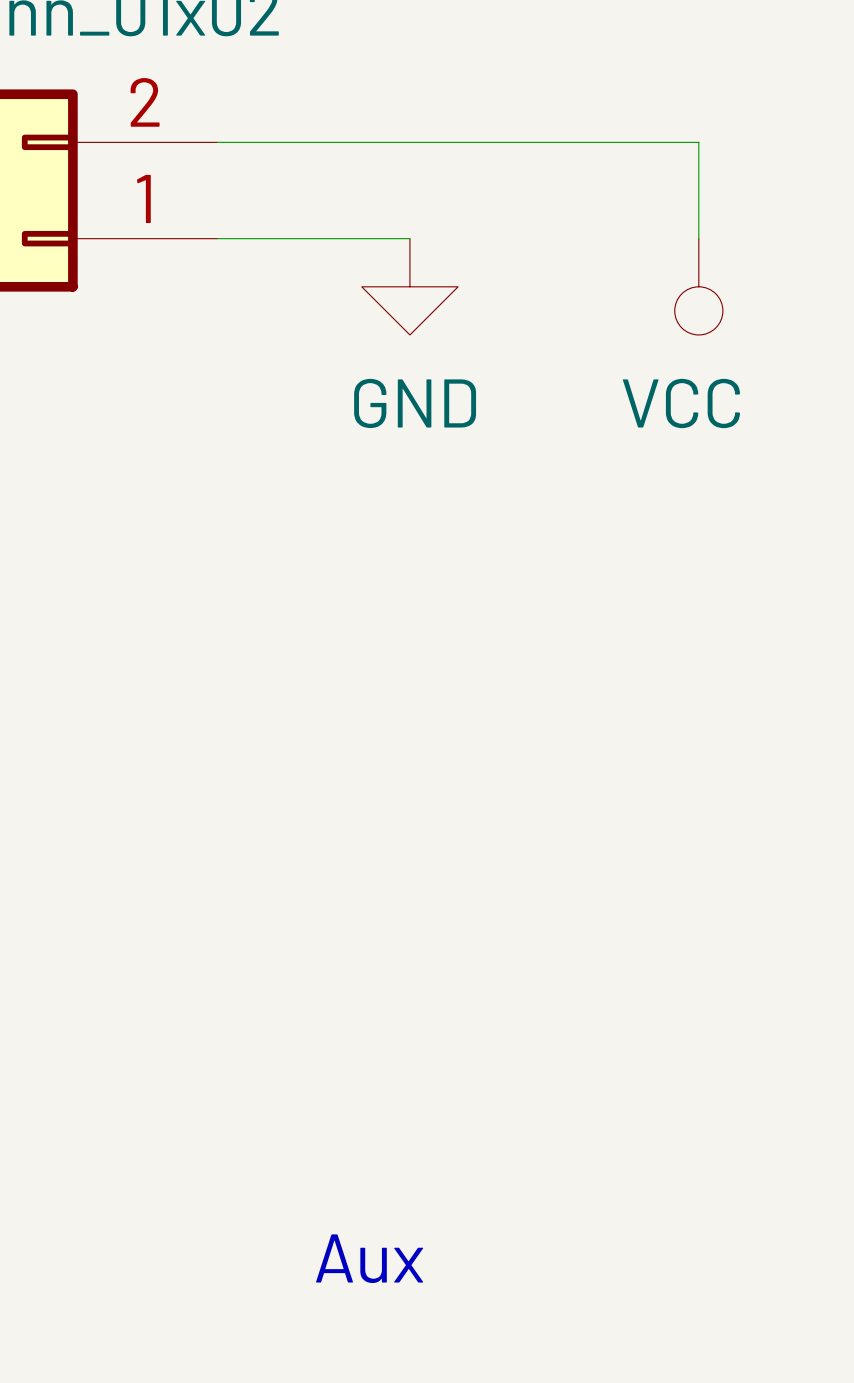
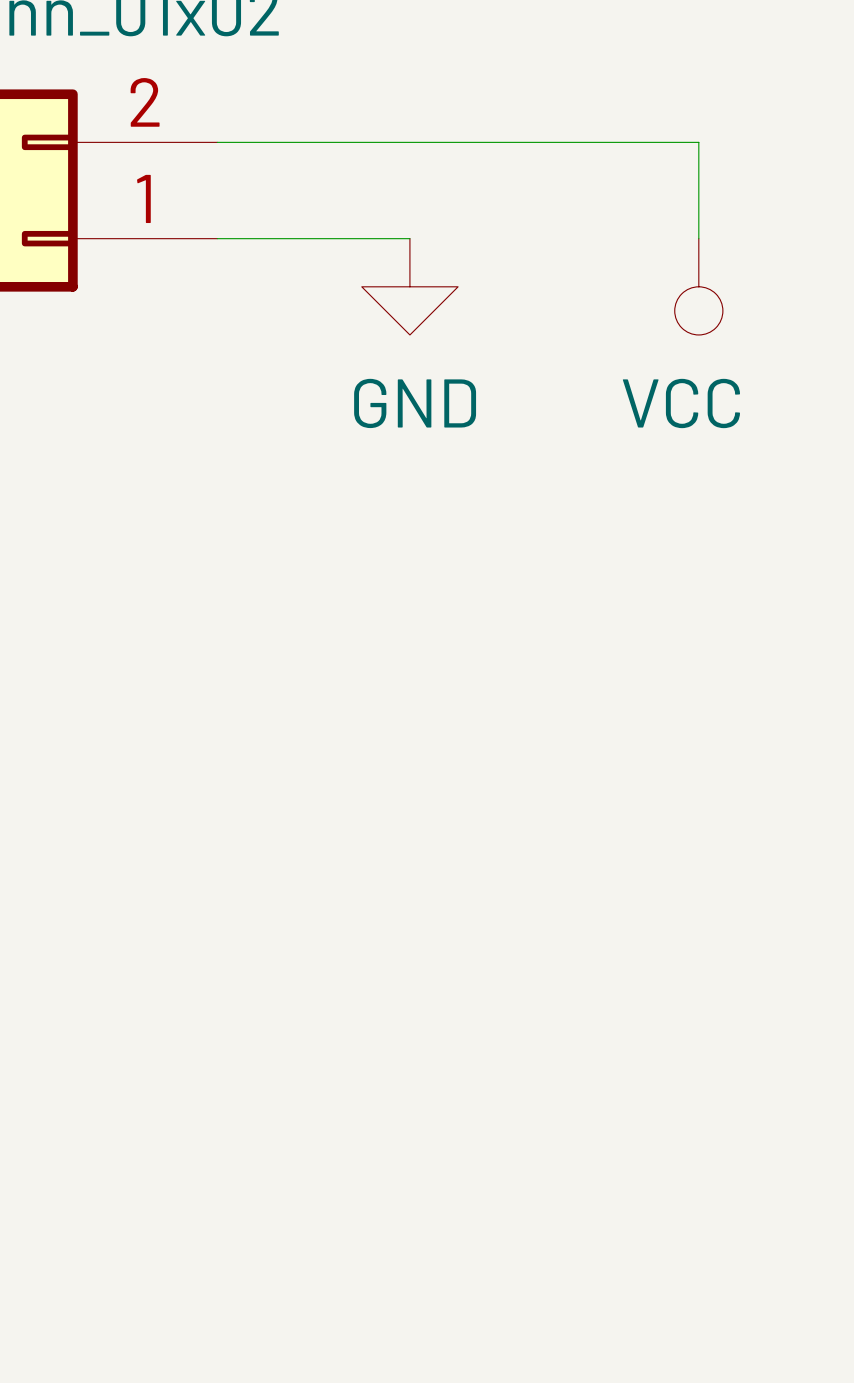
text: Aux (369, 1258) -> none

